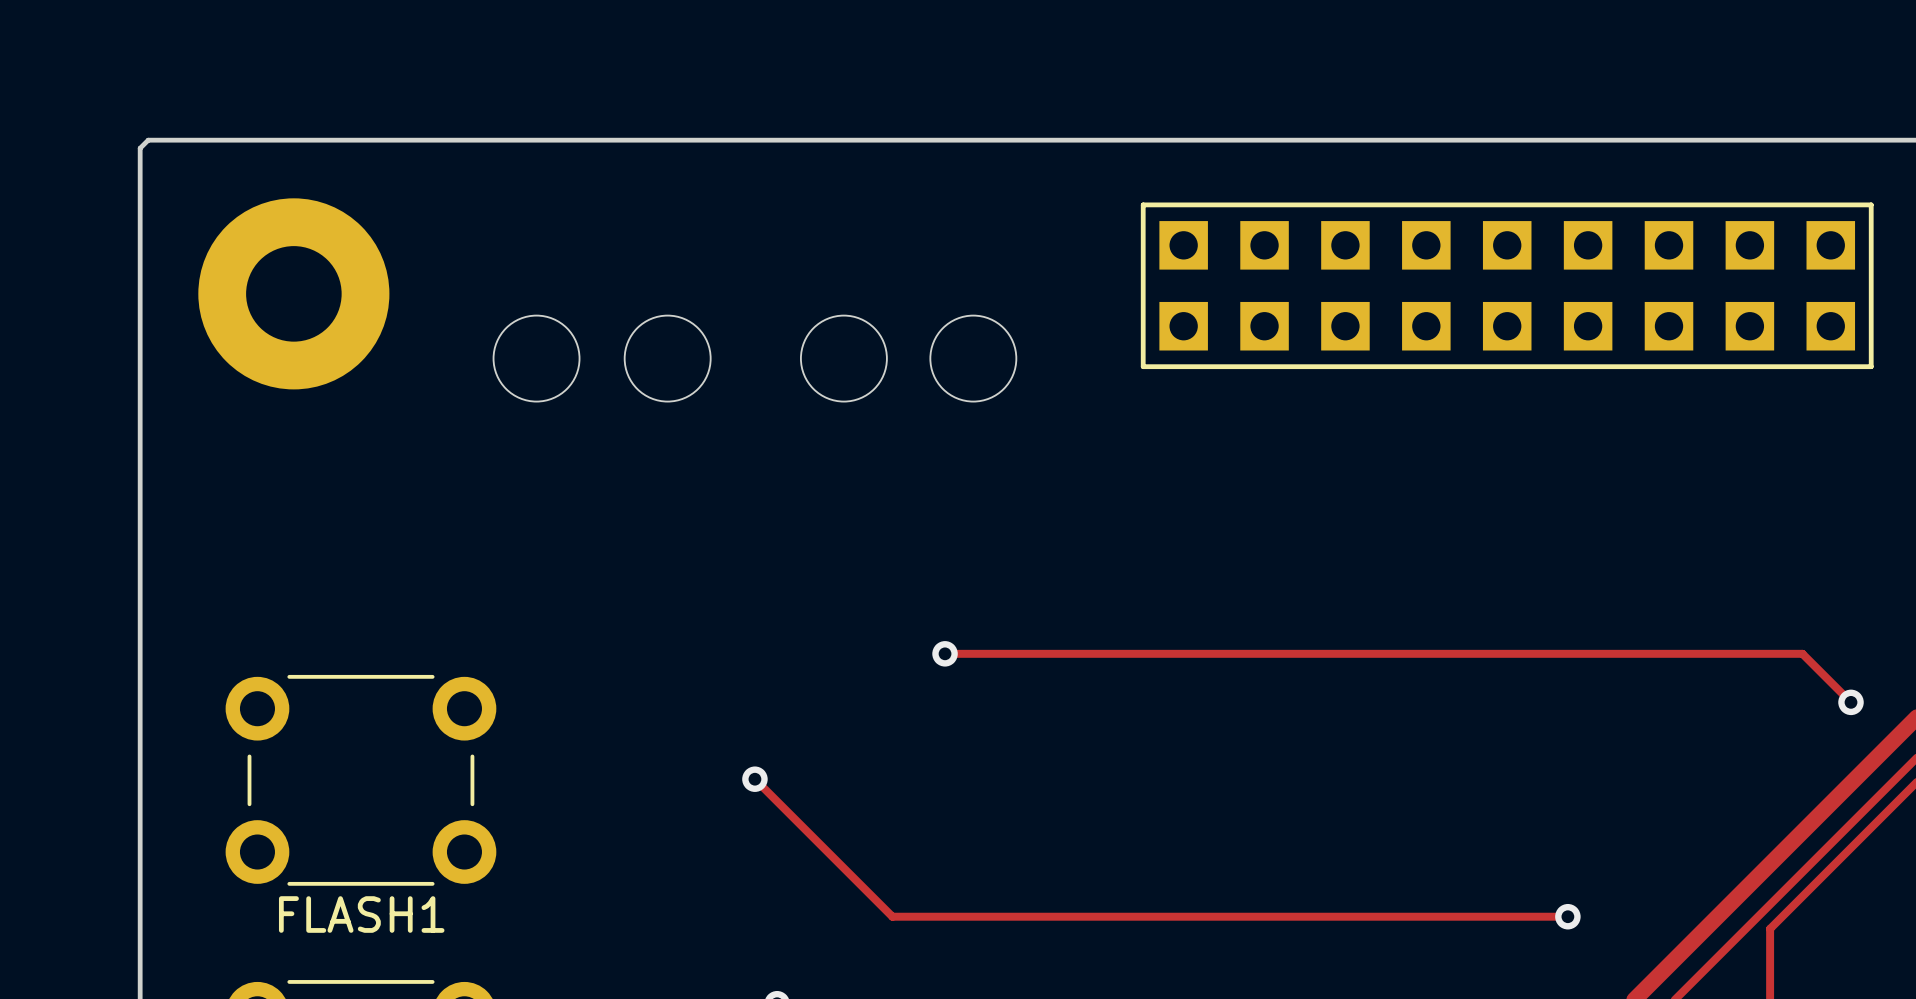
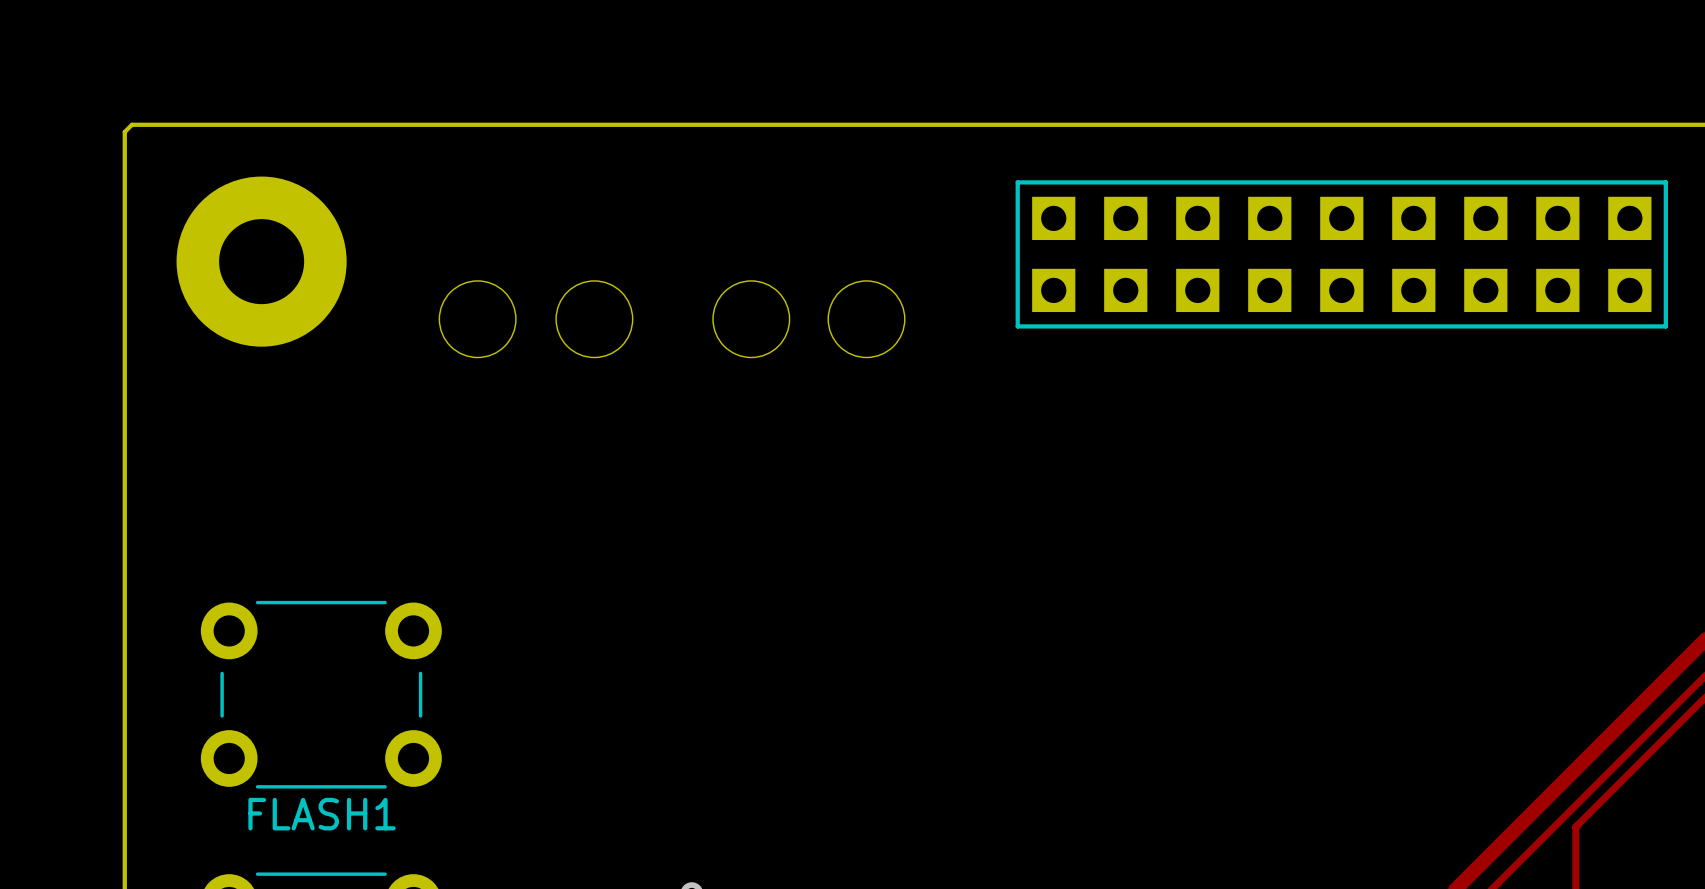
track: (945, 653) (1802, 653) (1851, 702) -> none
via: (945, 653) -> none
via: (1851, 702) -> none
track: (754, 779) (892, 916) (1567, 916) -> none
via: (754, 779) -> none
via: (1567, 916) -> none

